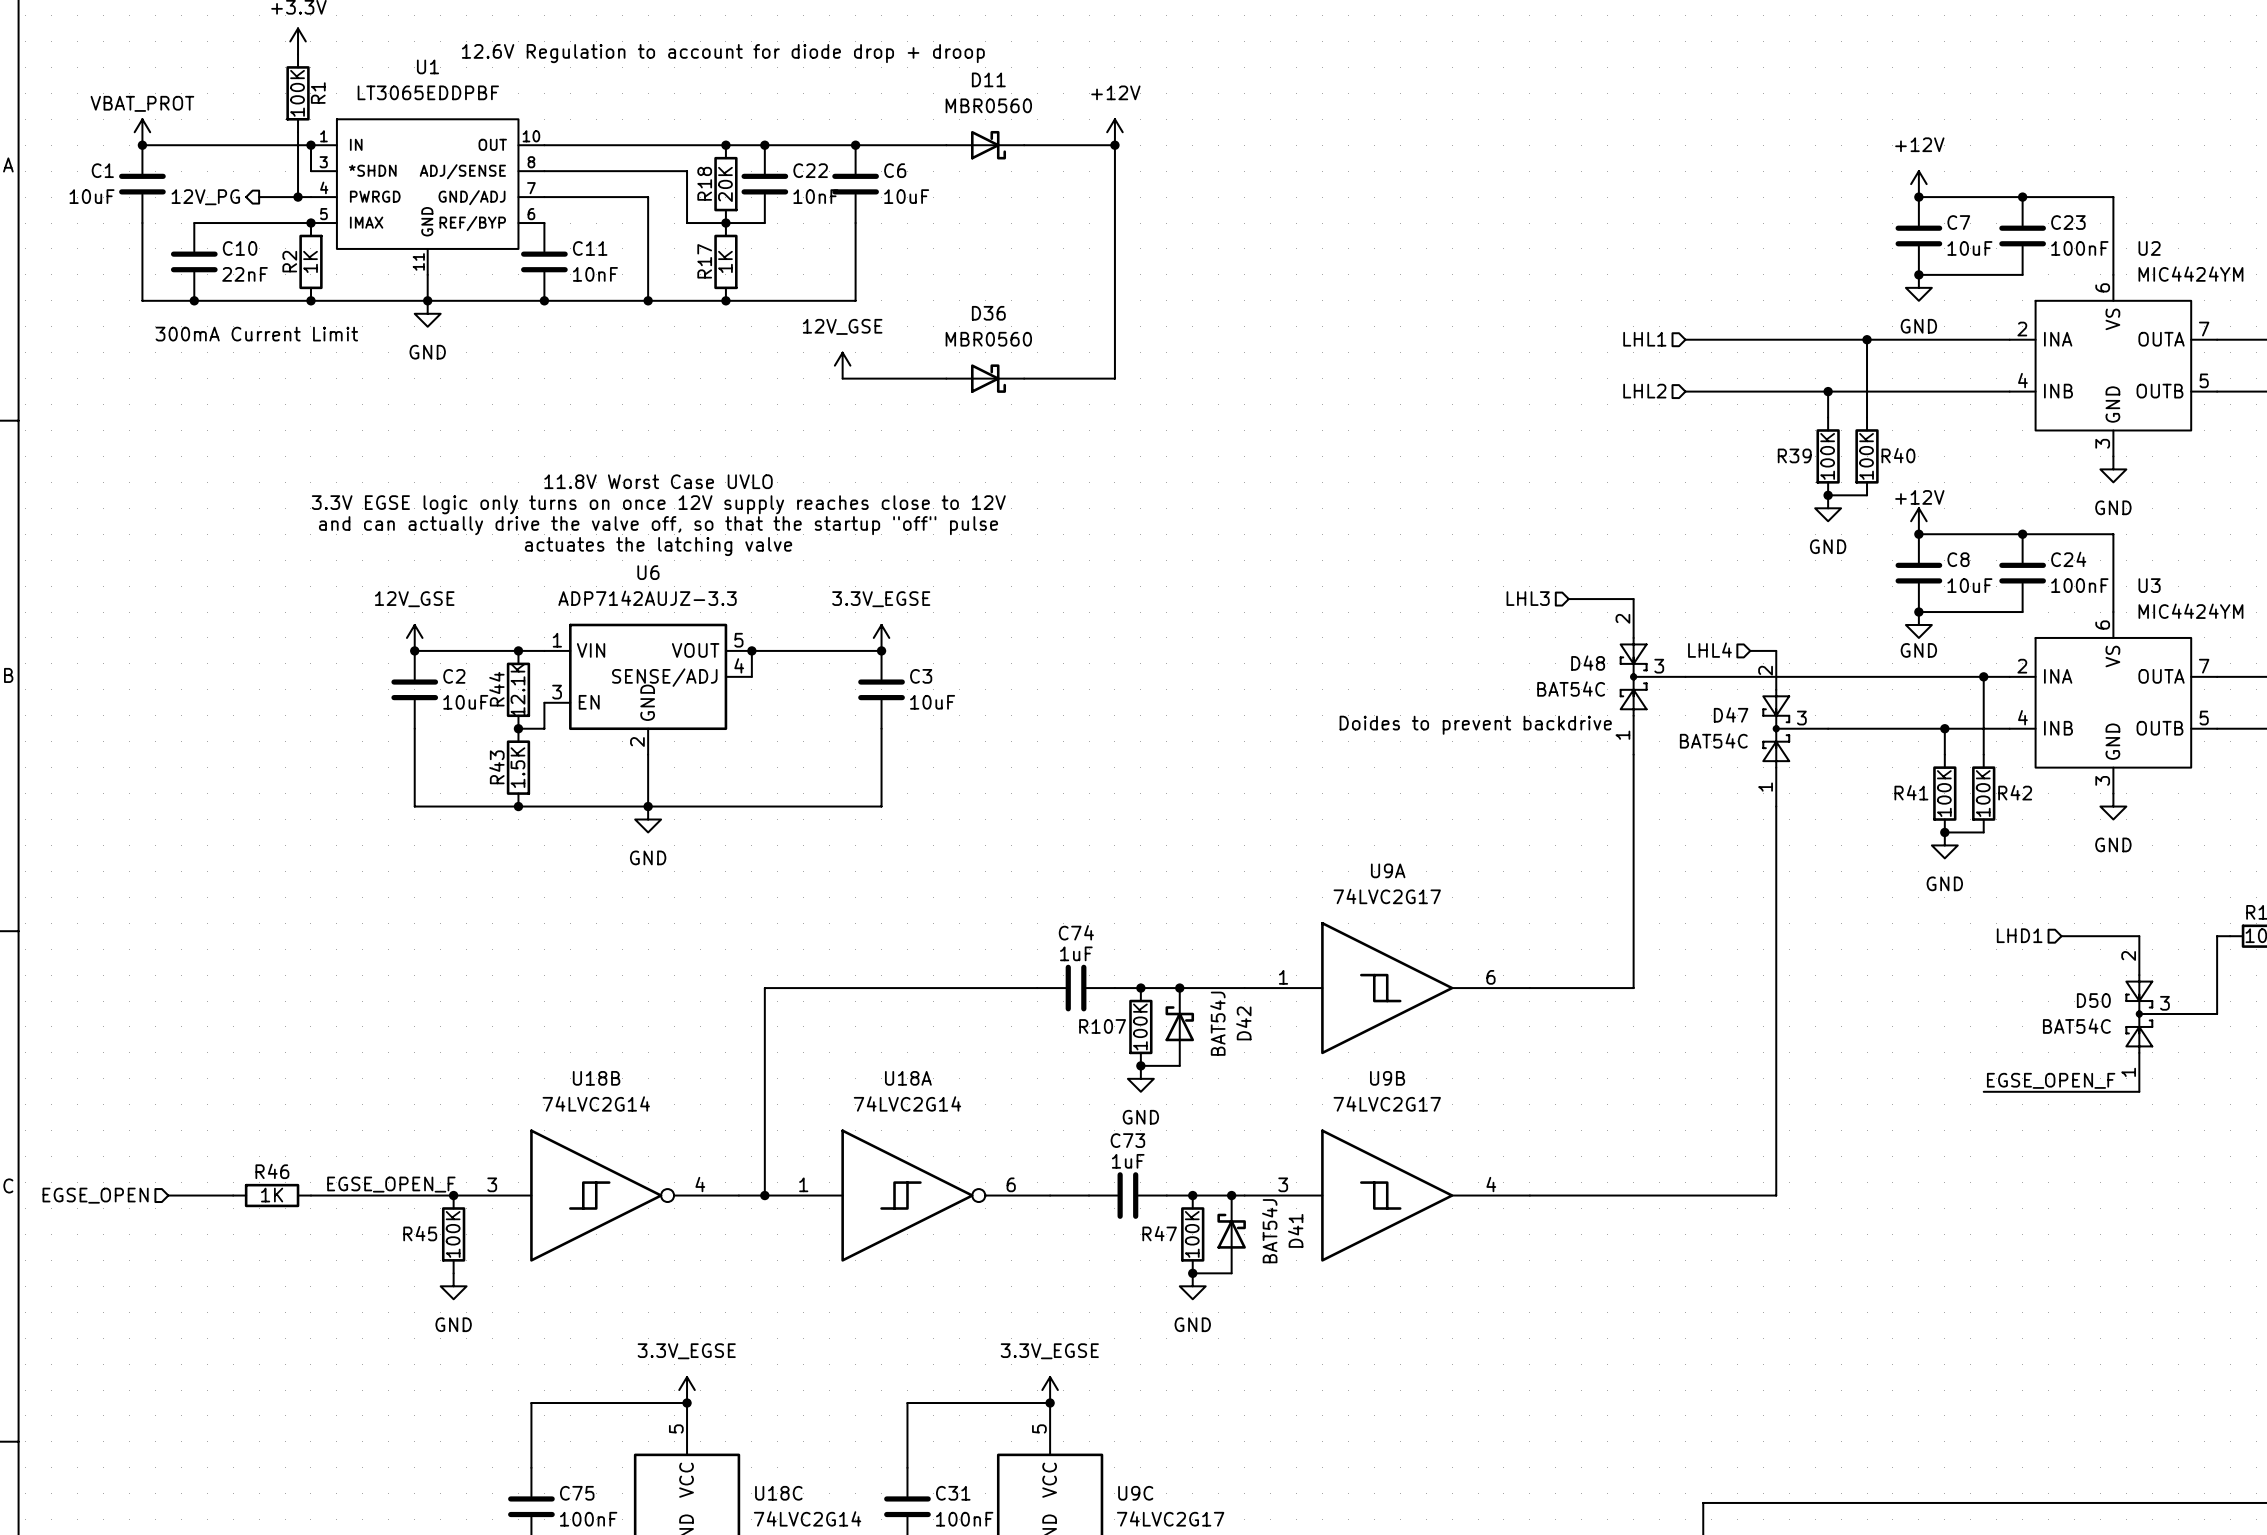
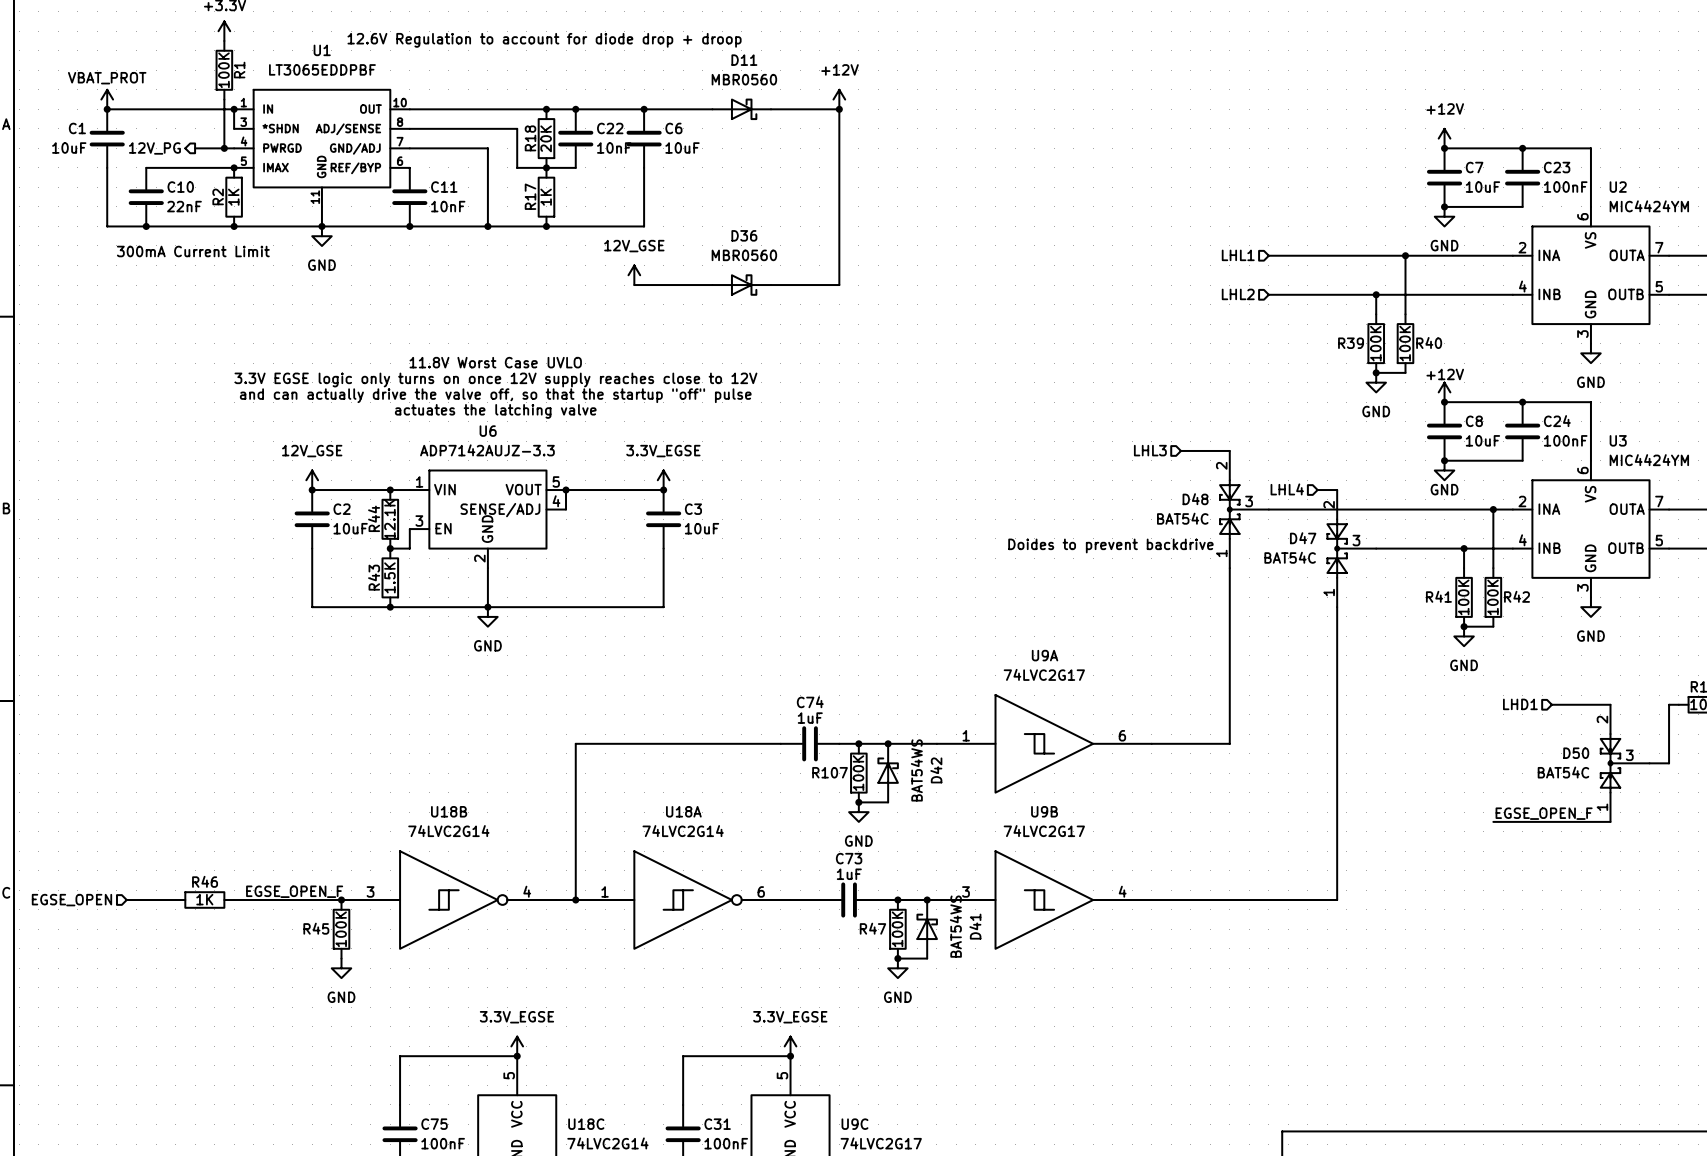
D42 value: BAT54J (1217, 1023) -> BAT54WS (916, 770)
D41 value: BAT54J (1269, 1231) -> BAT54WS (955, 926)

